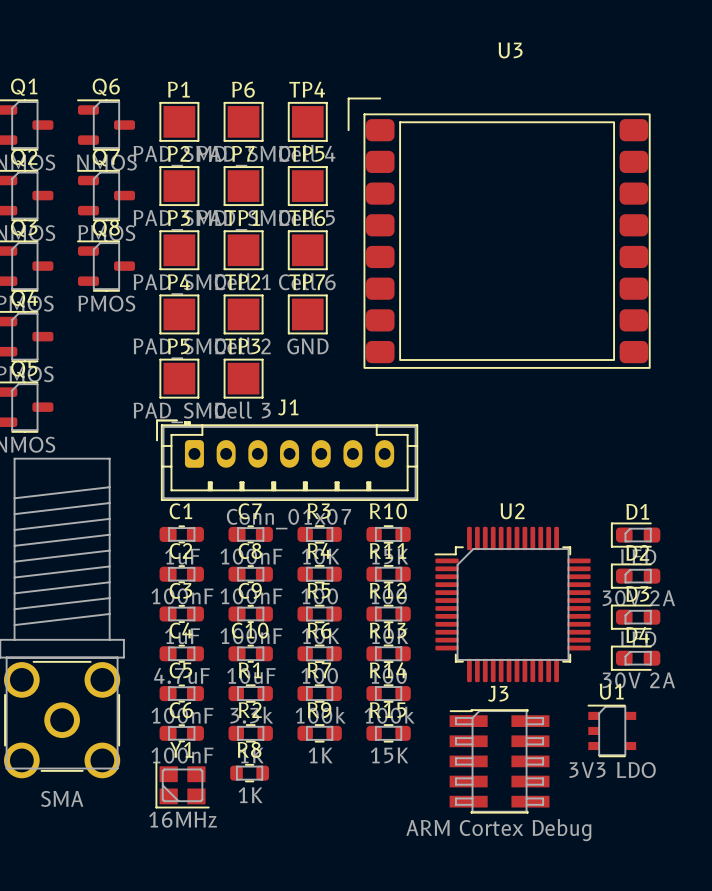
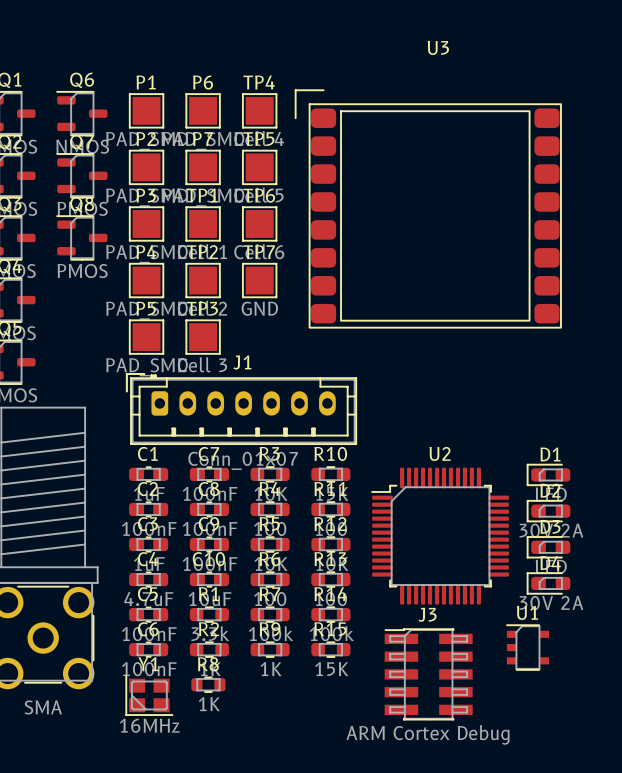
U1 value: 3V3 LDO (612, 770) -> none

